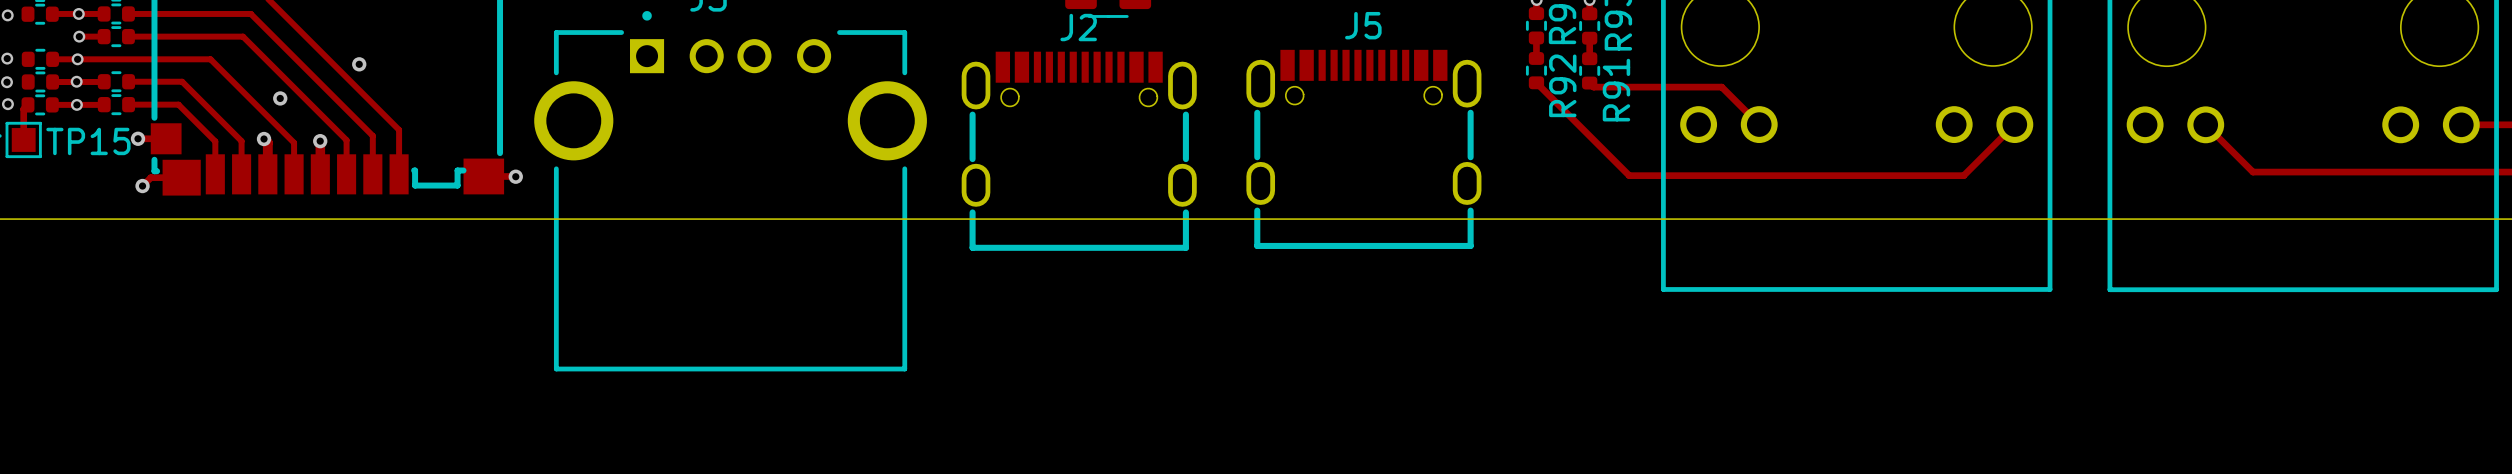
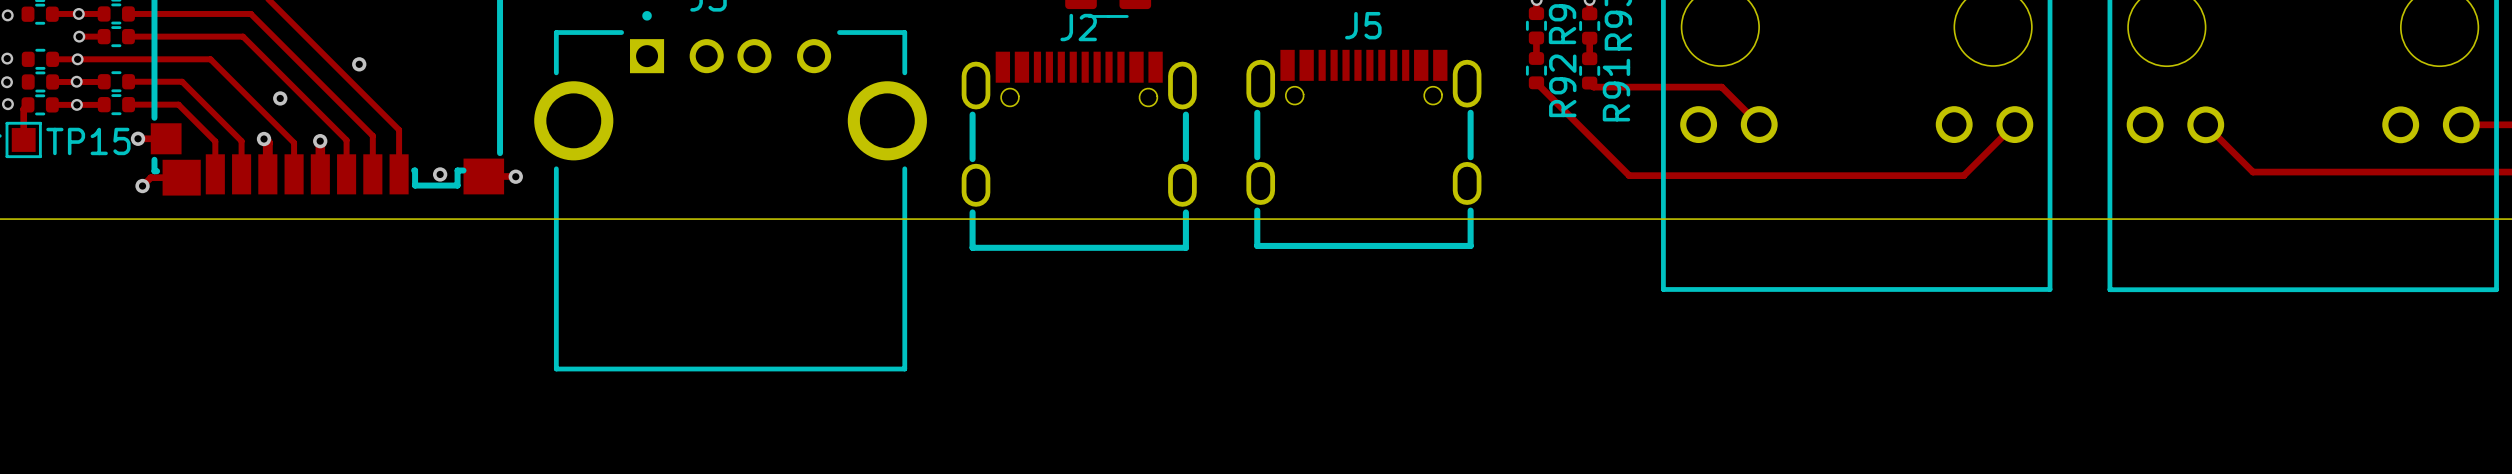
via: none -> (440, 174)

